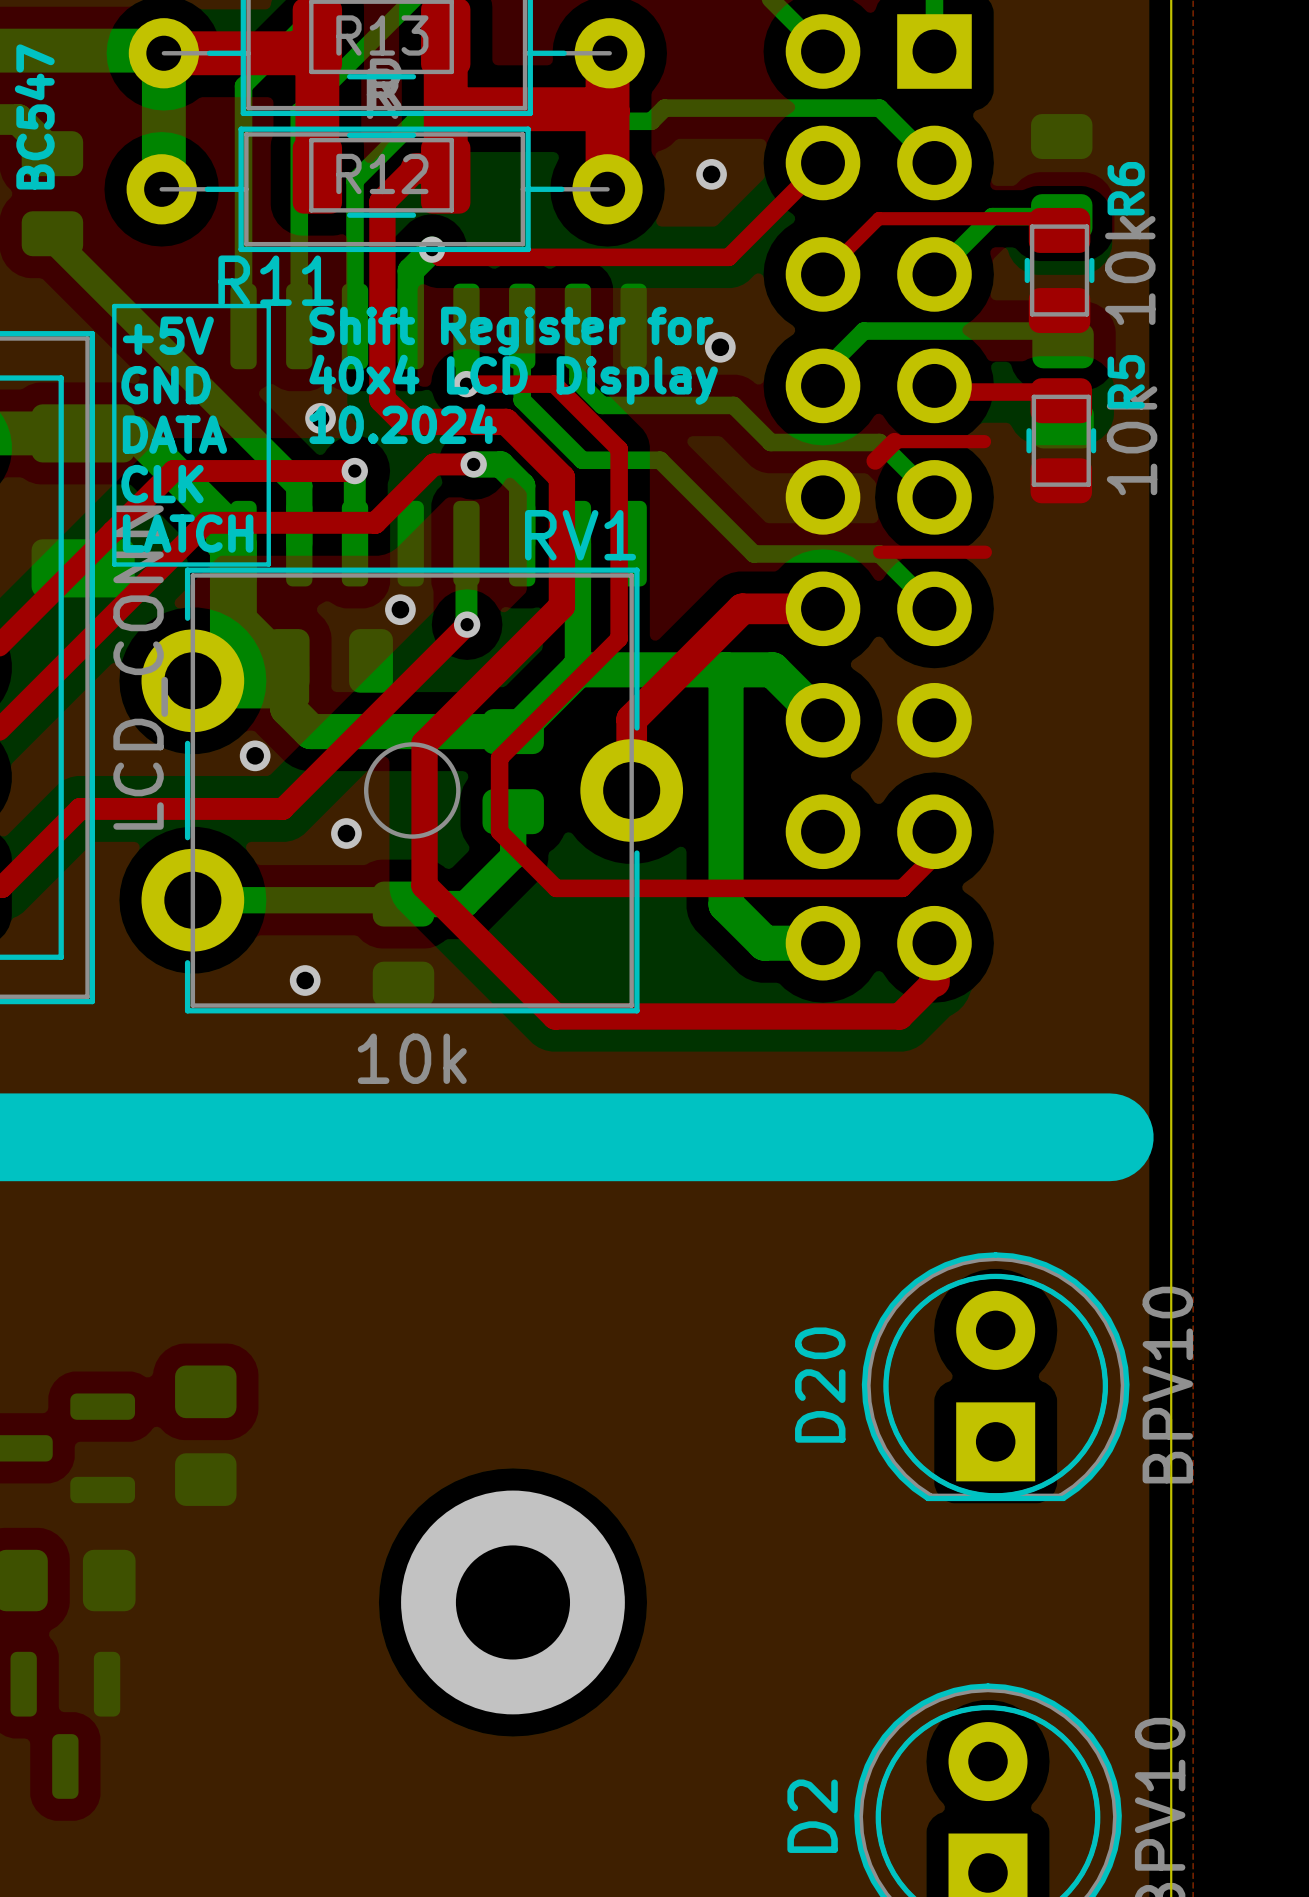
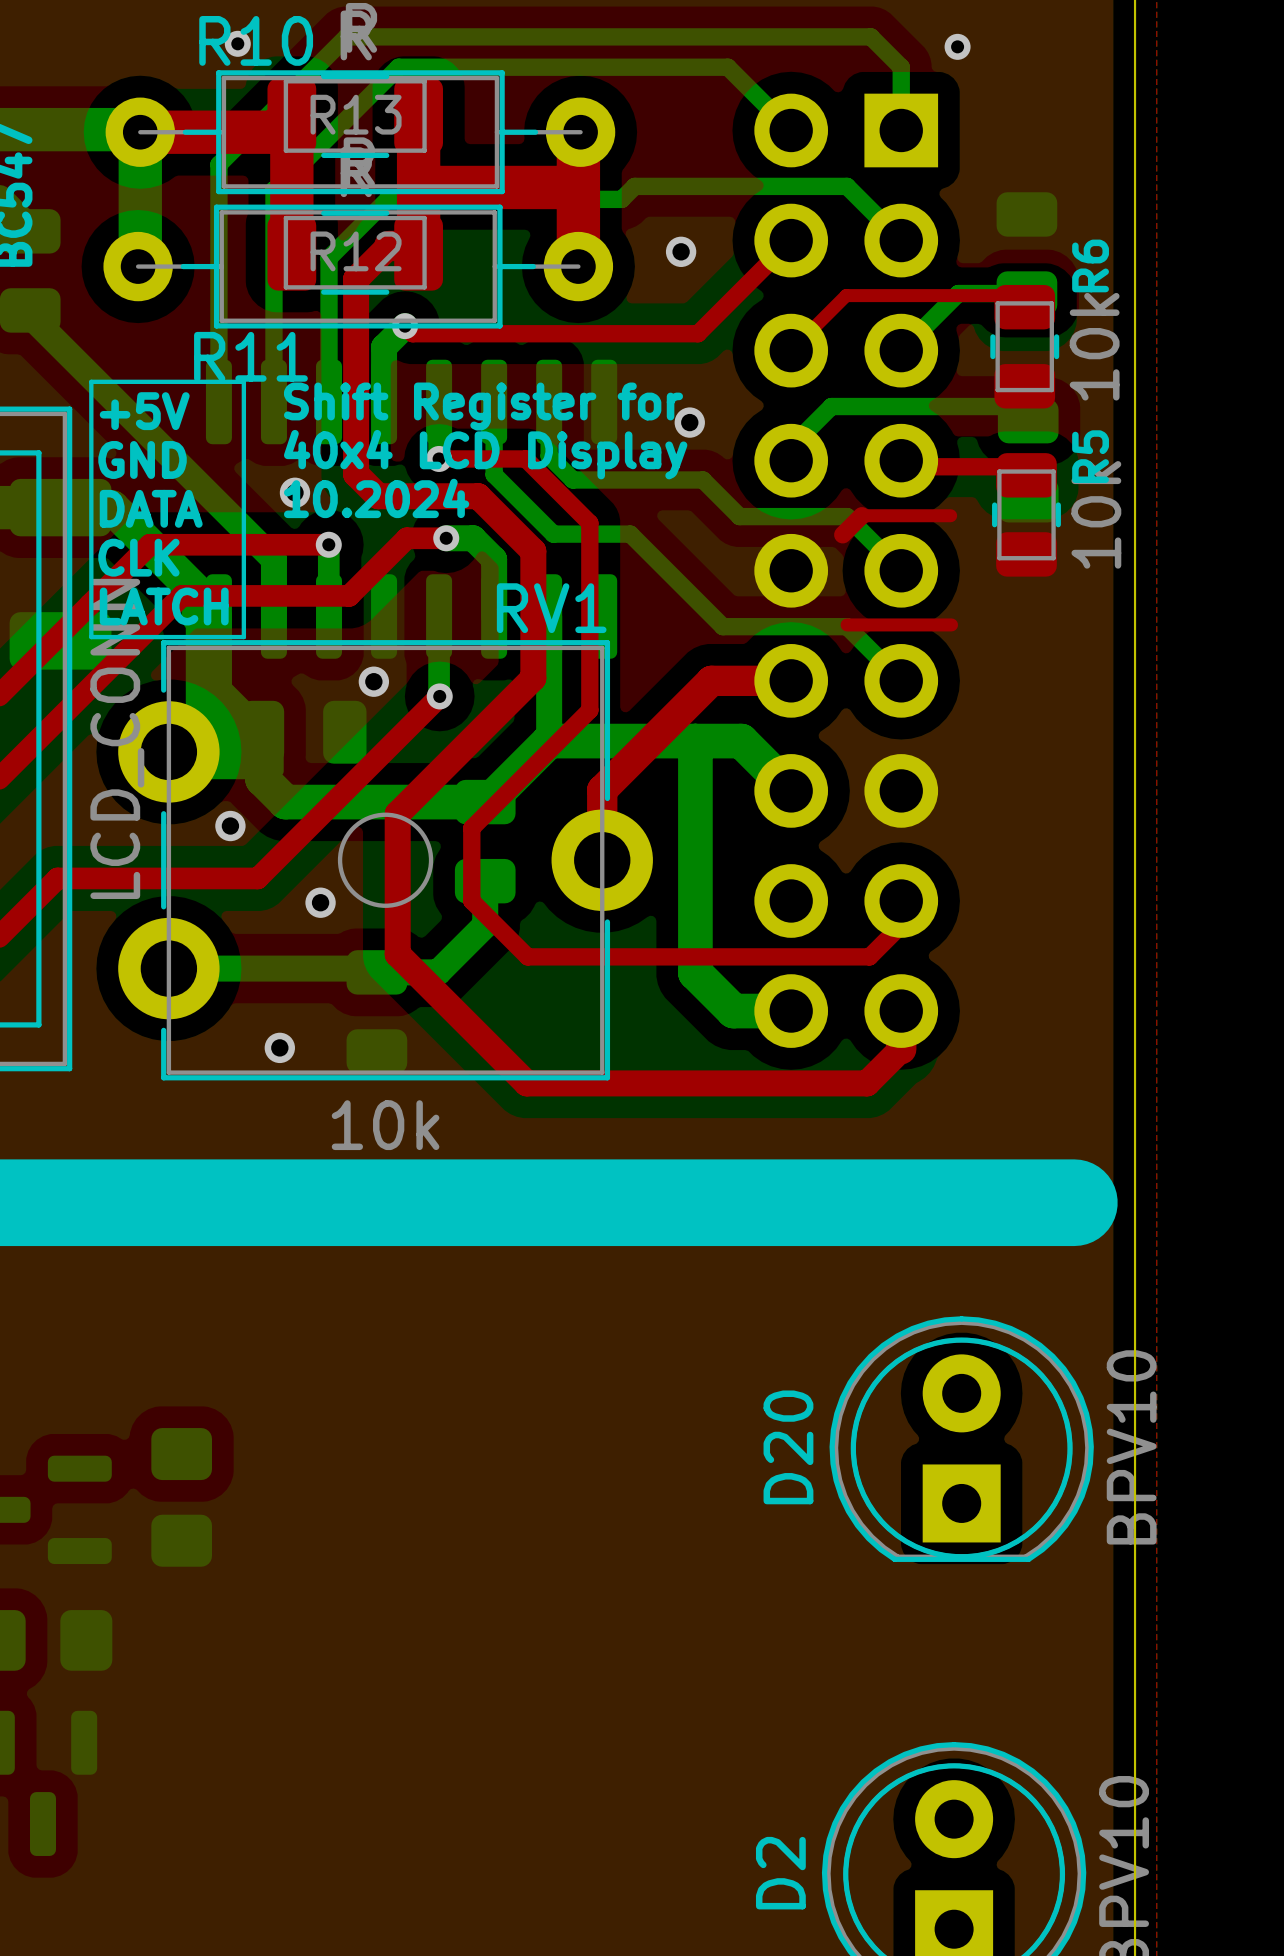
via: (512, 1602) -> none

